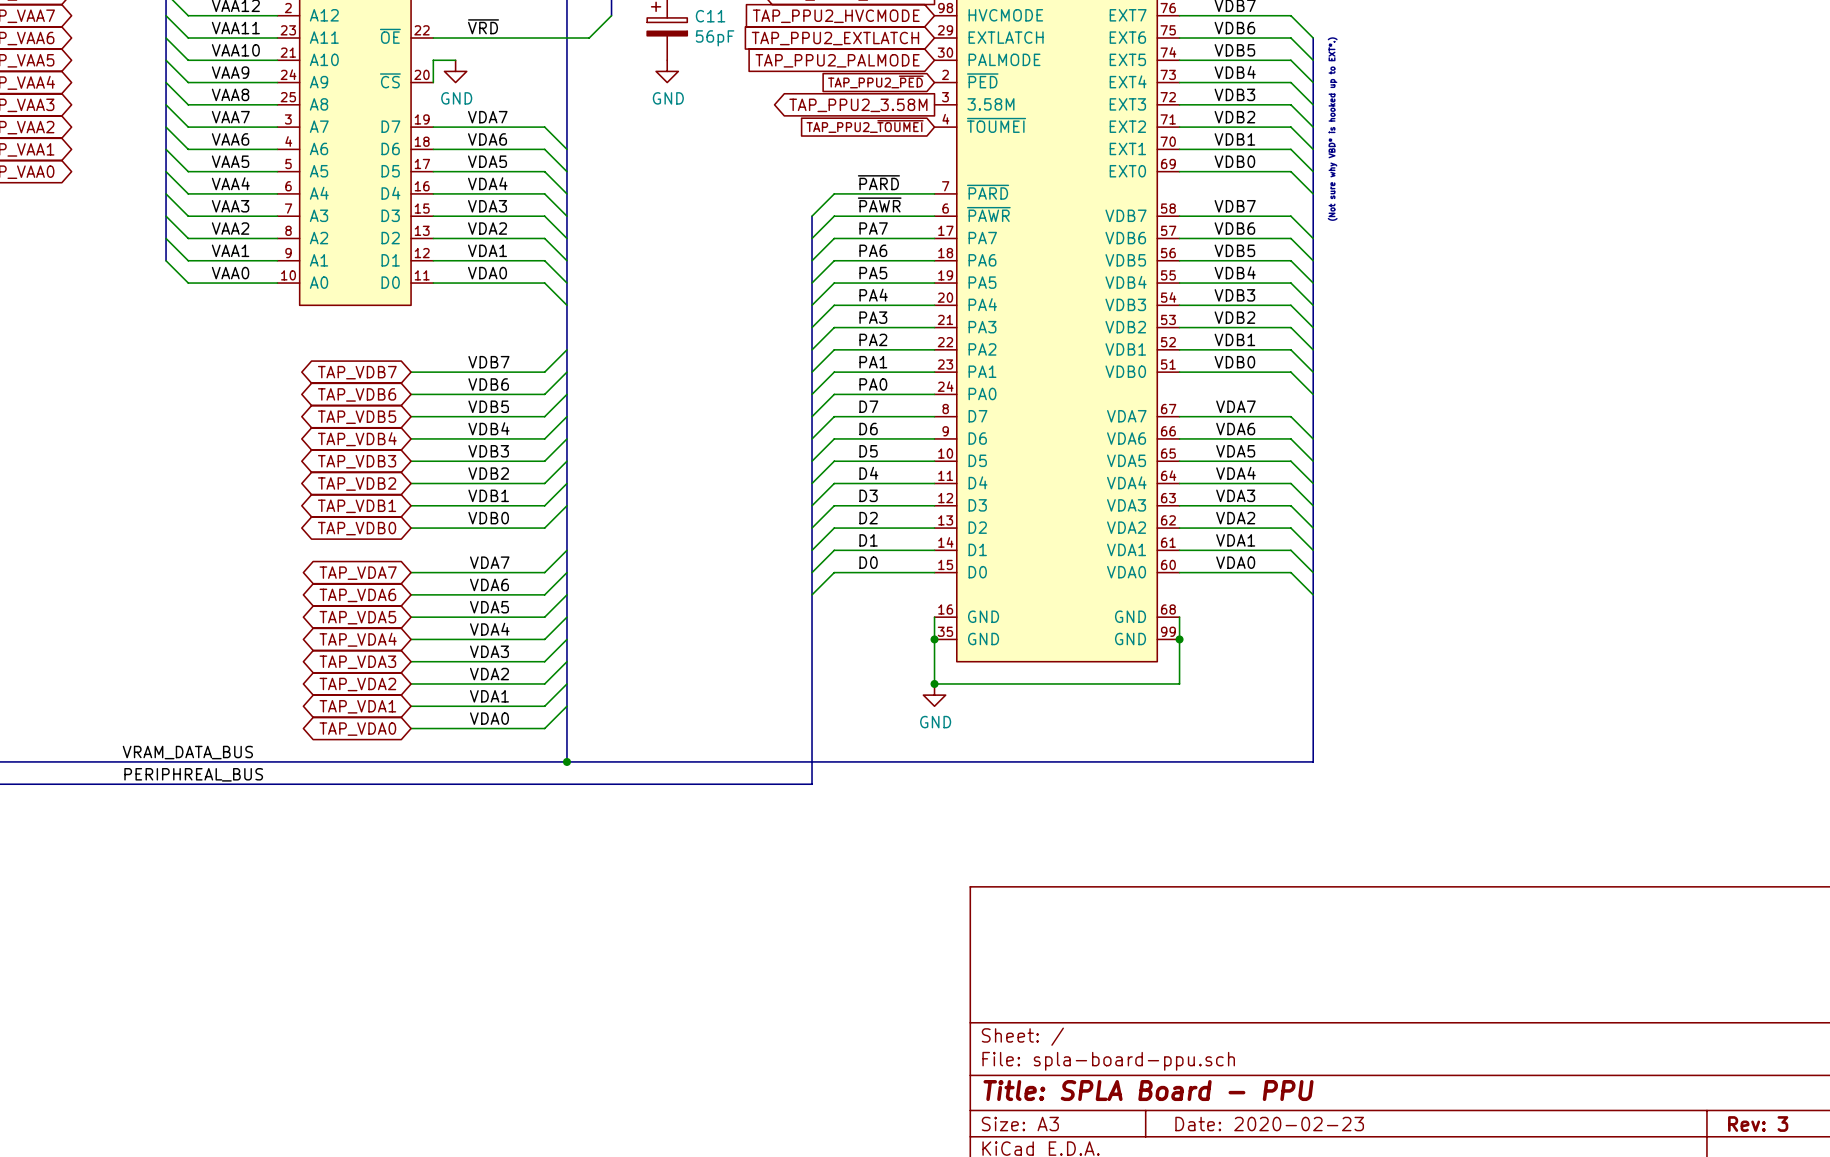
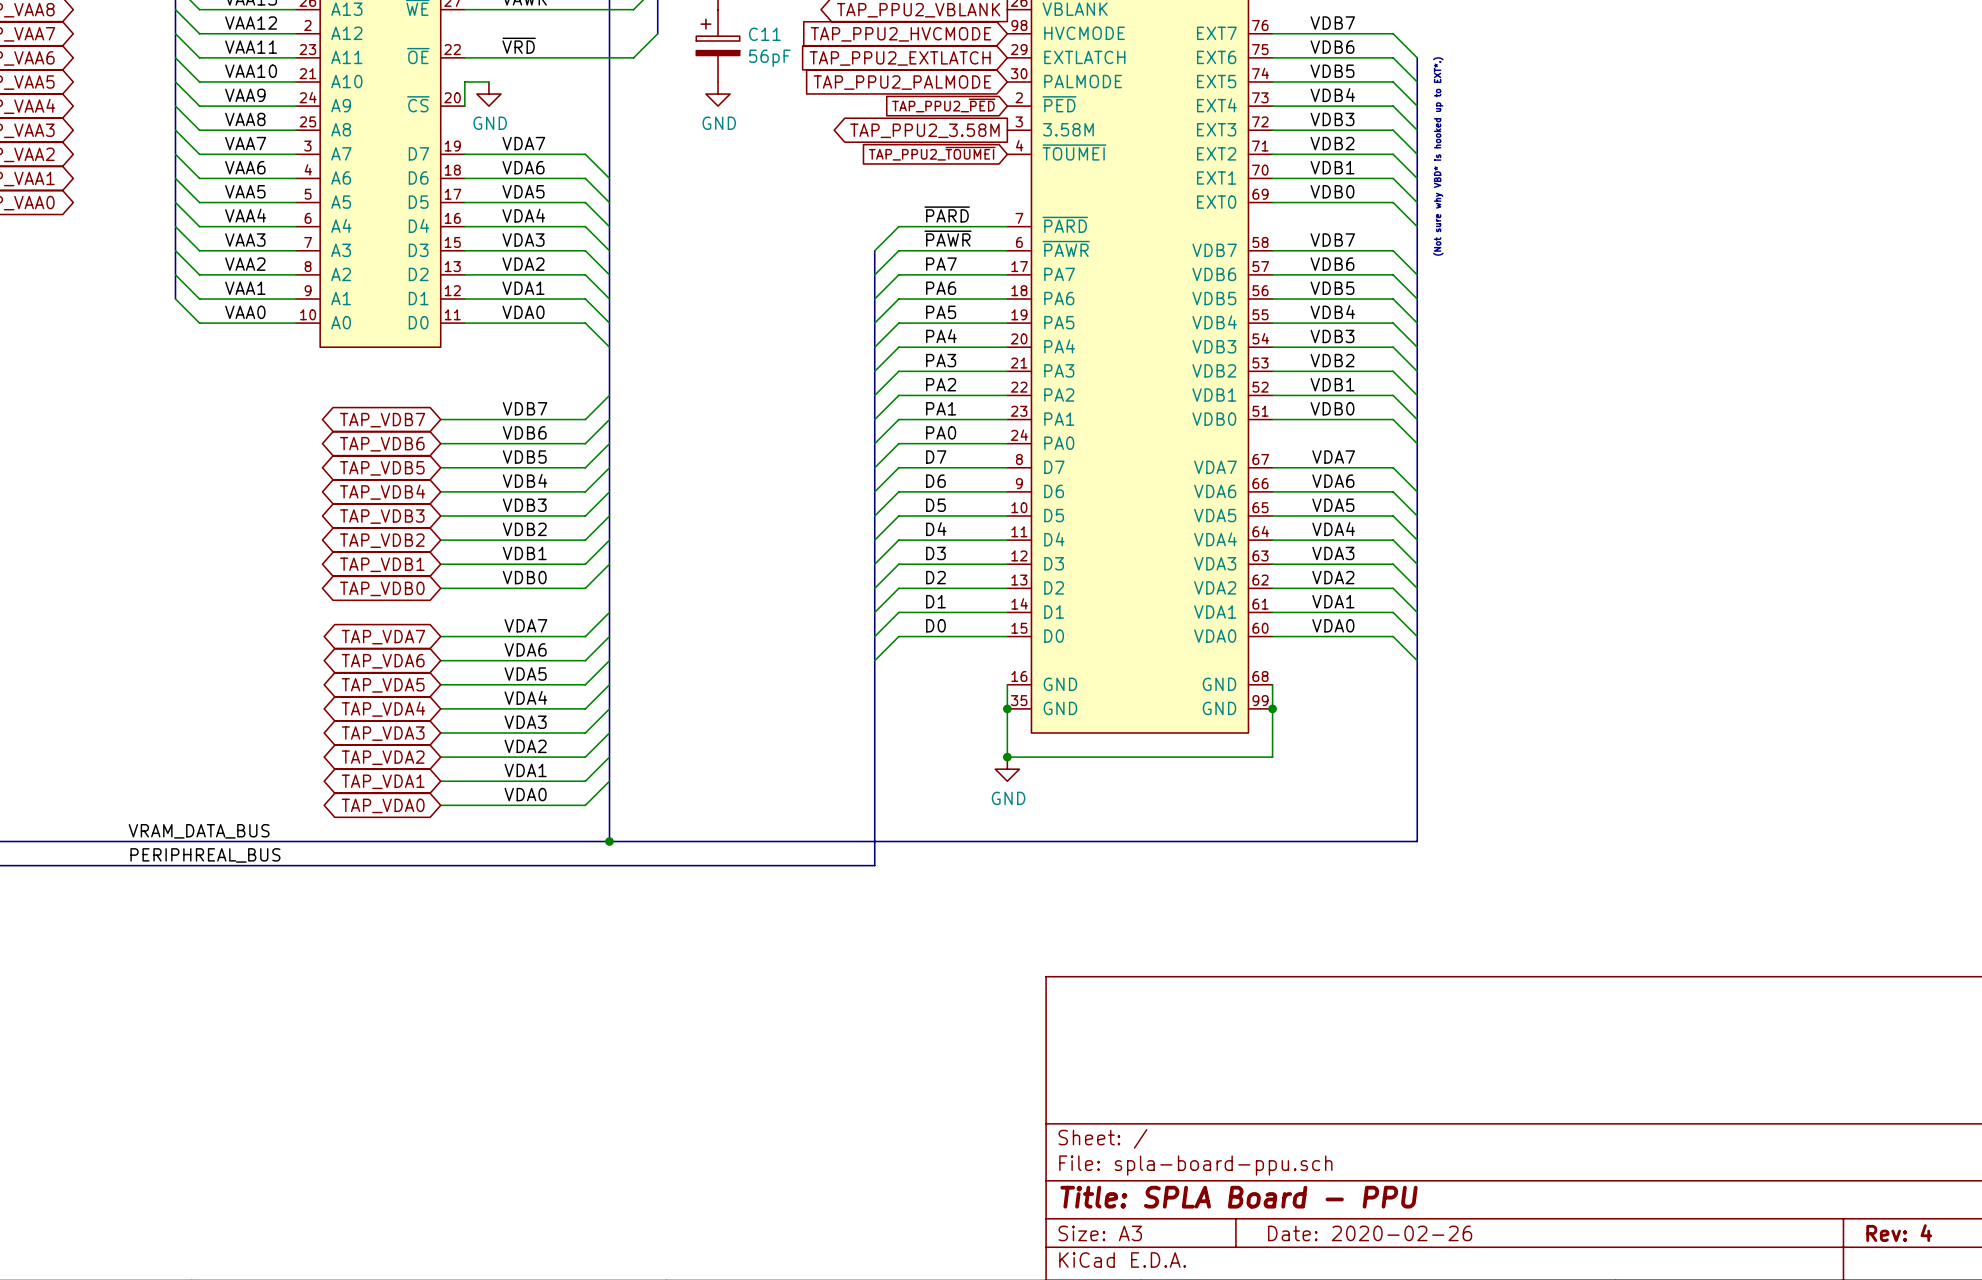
title block: Date: 2020-02-23 (1269, 1124) -> Date: 2020-02-26 (1370, 1233)
title block: Rev: 3 (1758, 1124) -> Rev: 4 (1899, 1233)

